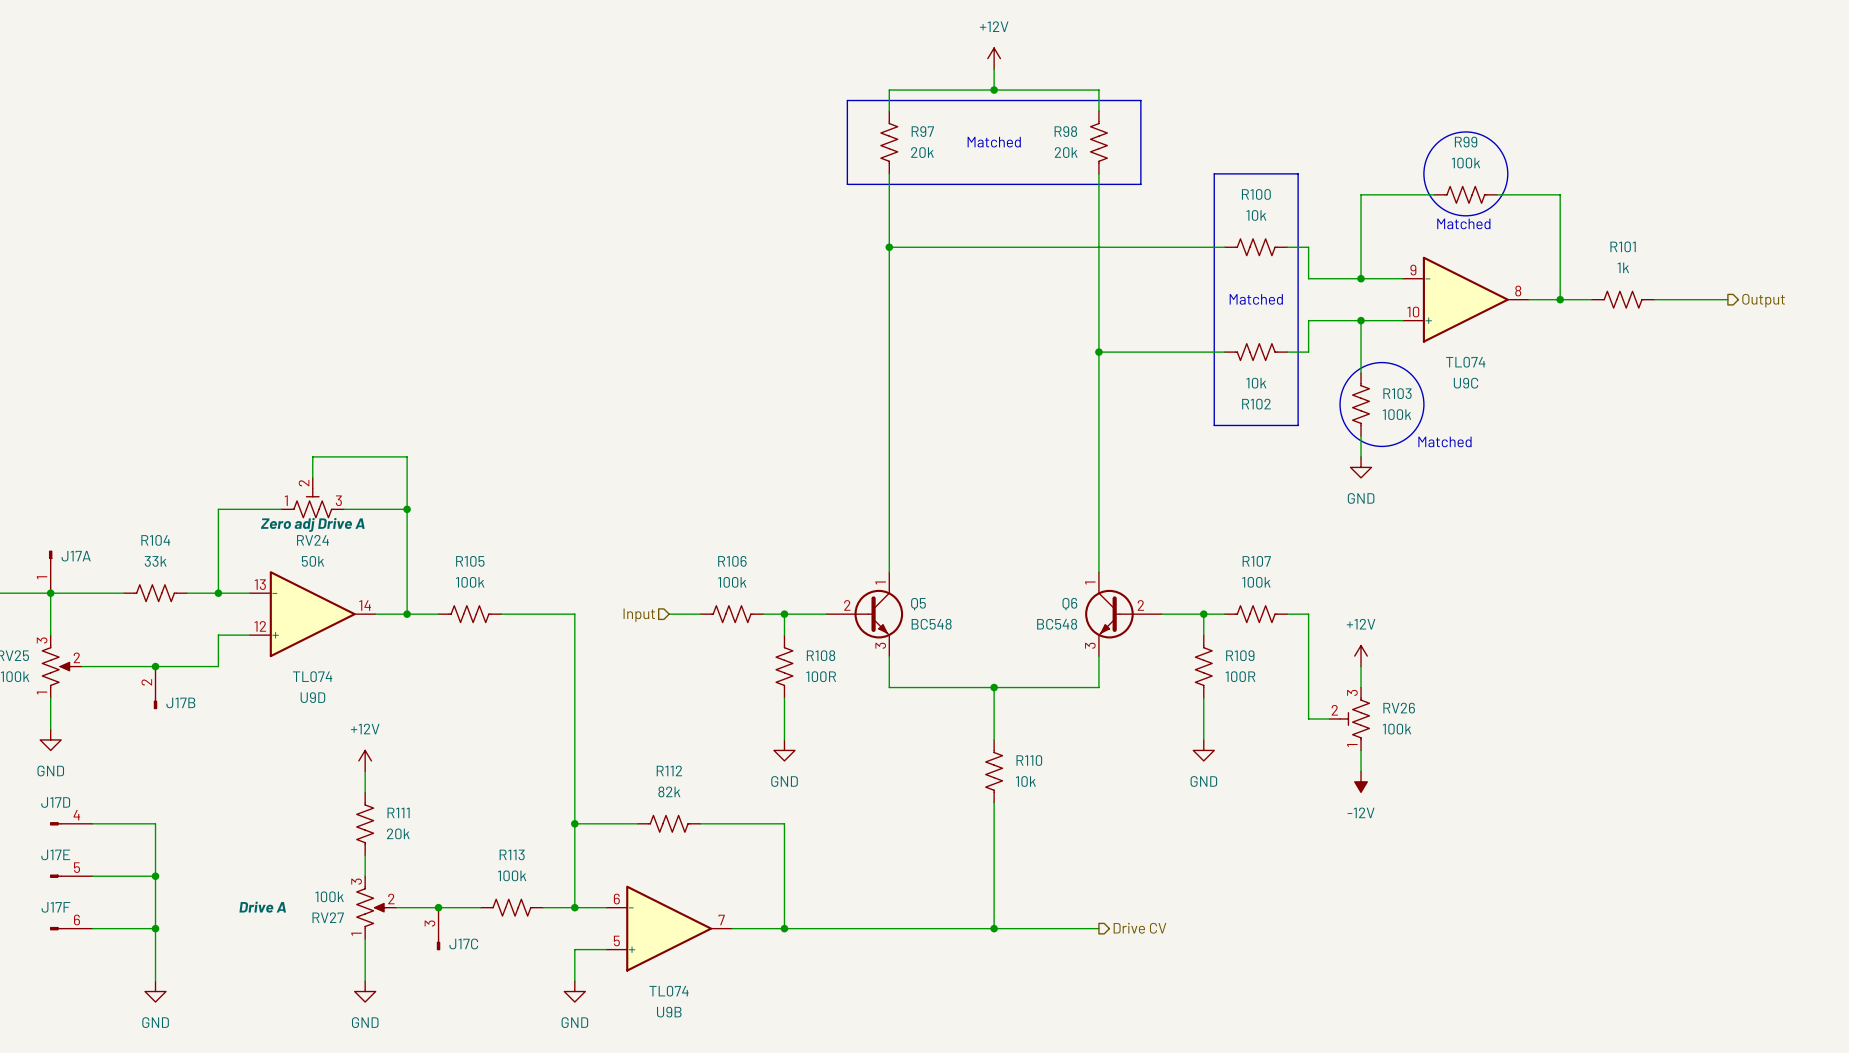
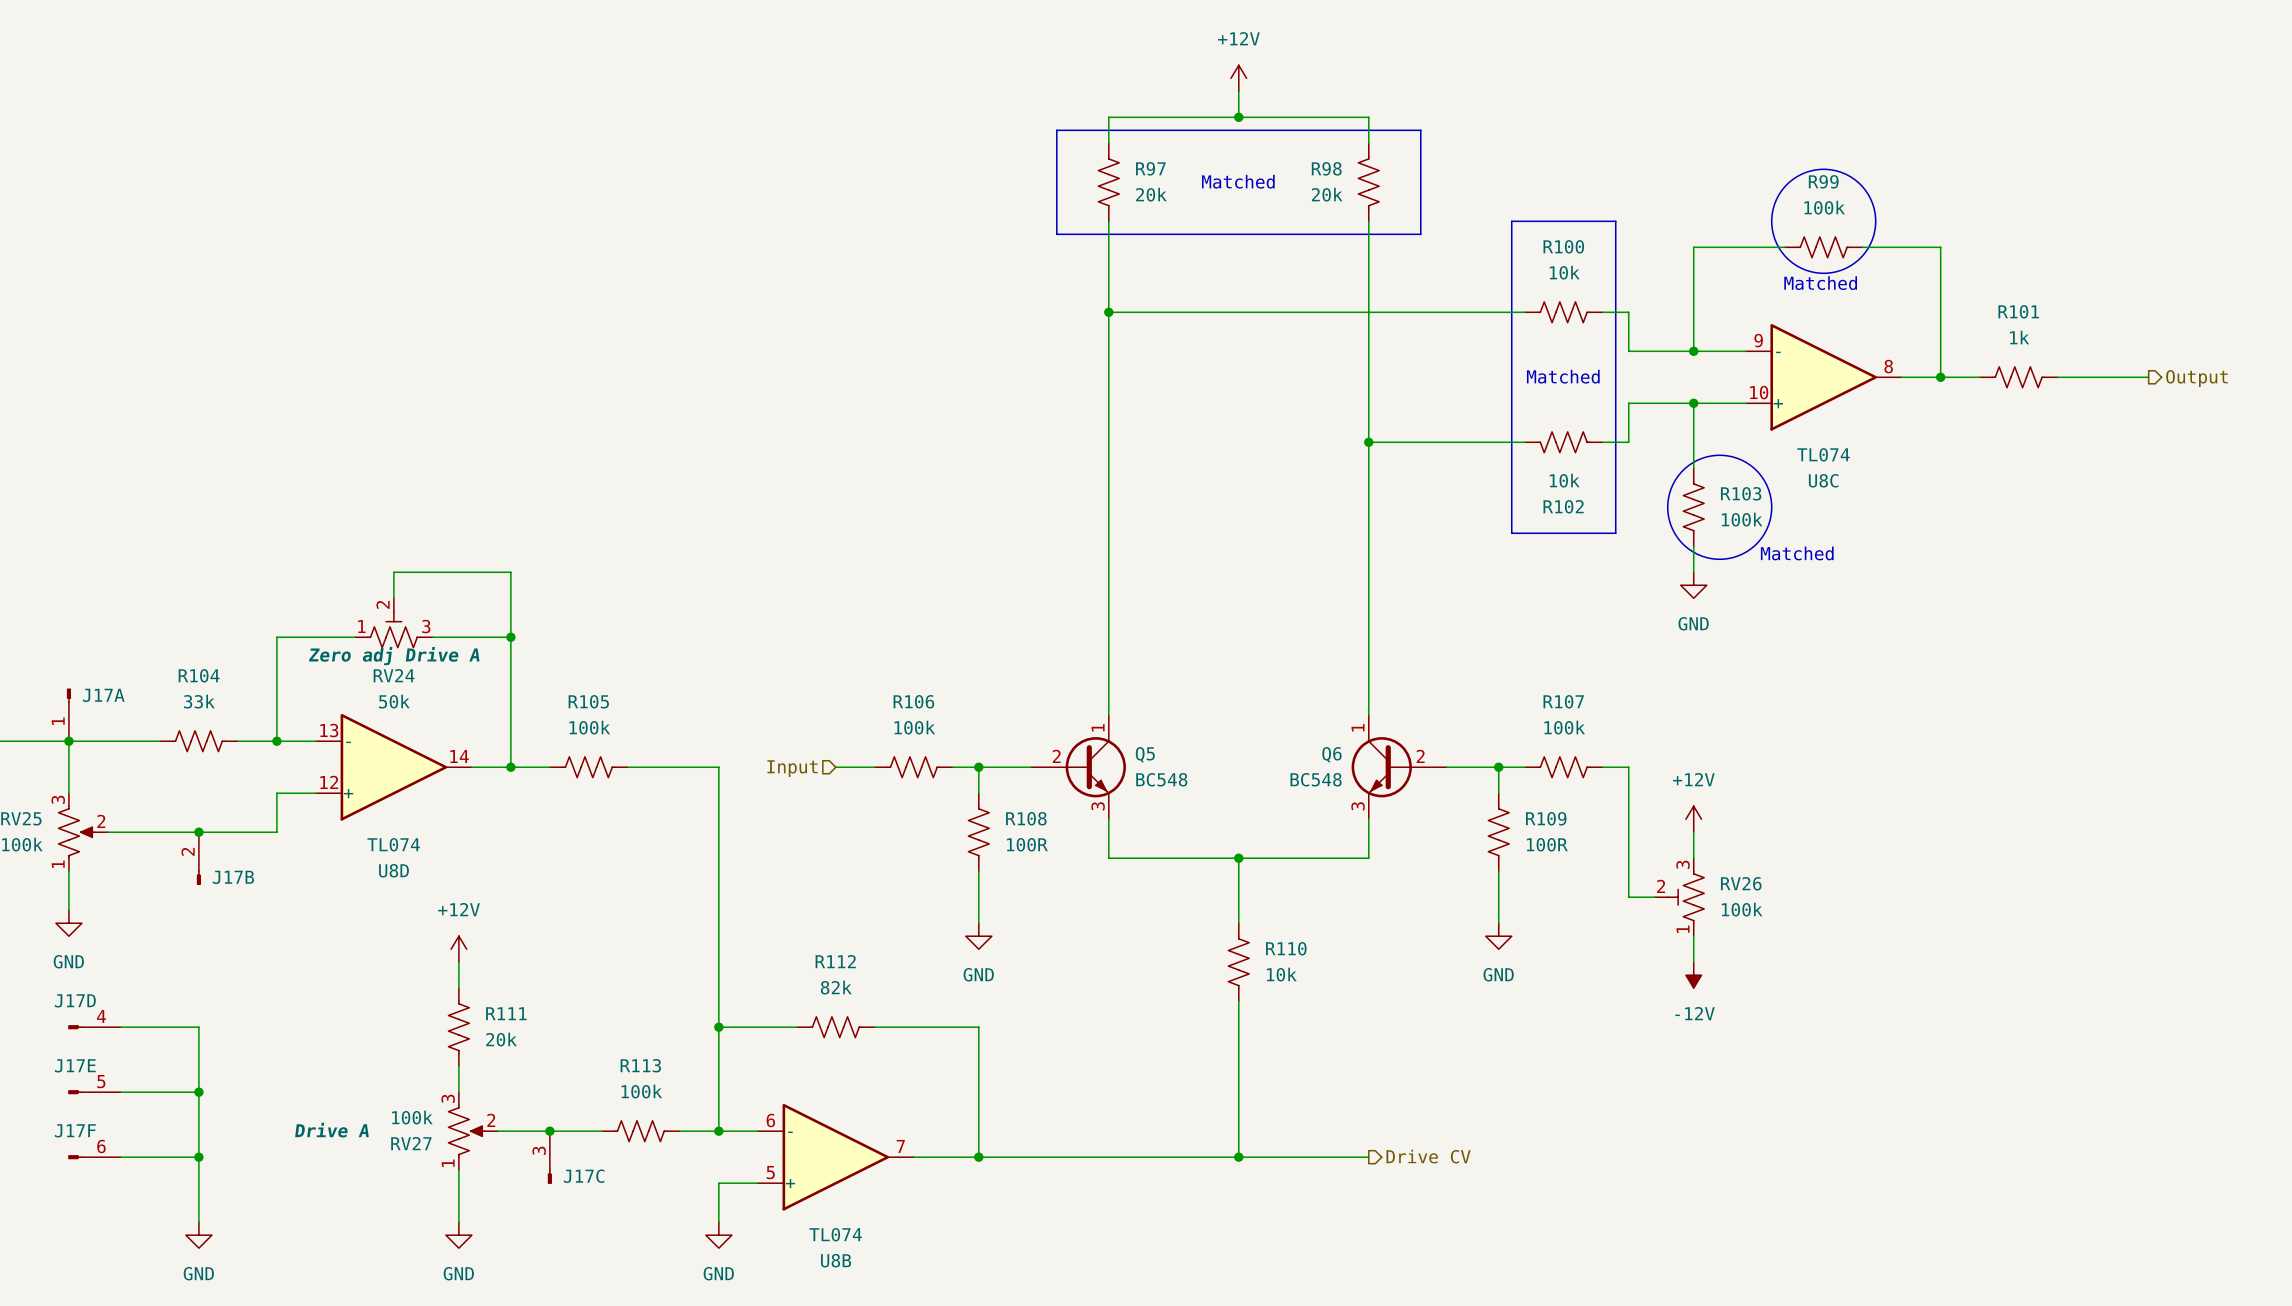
U9C name: U9C (1466, 383) -> U8C (1823, 480)
U9D name: U9D (312, 697) -> U8D (393, 870)
U9B name: U9B (669, 1012) -> U8B (836, 1260)

